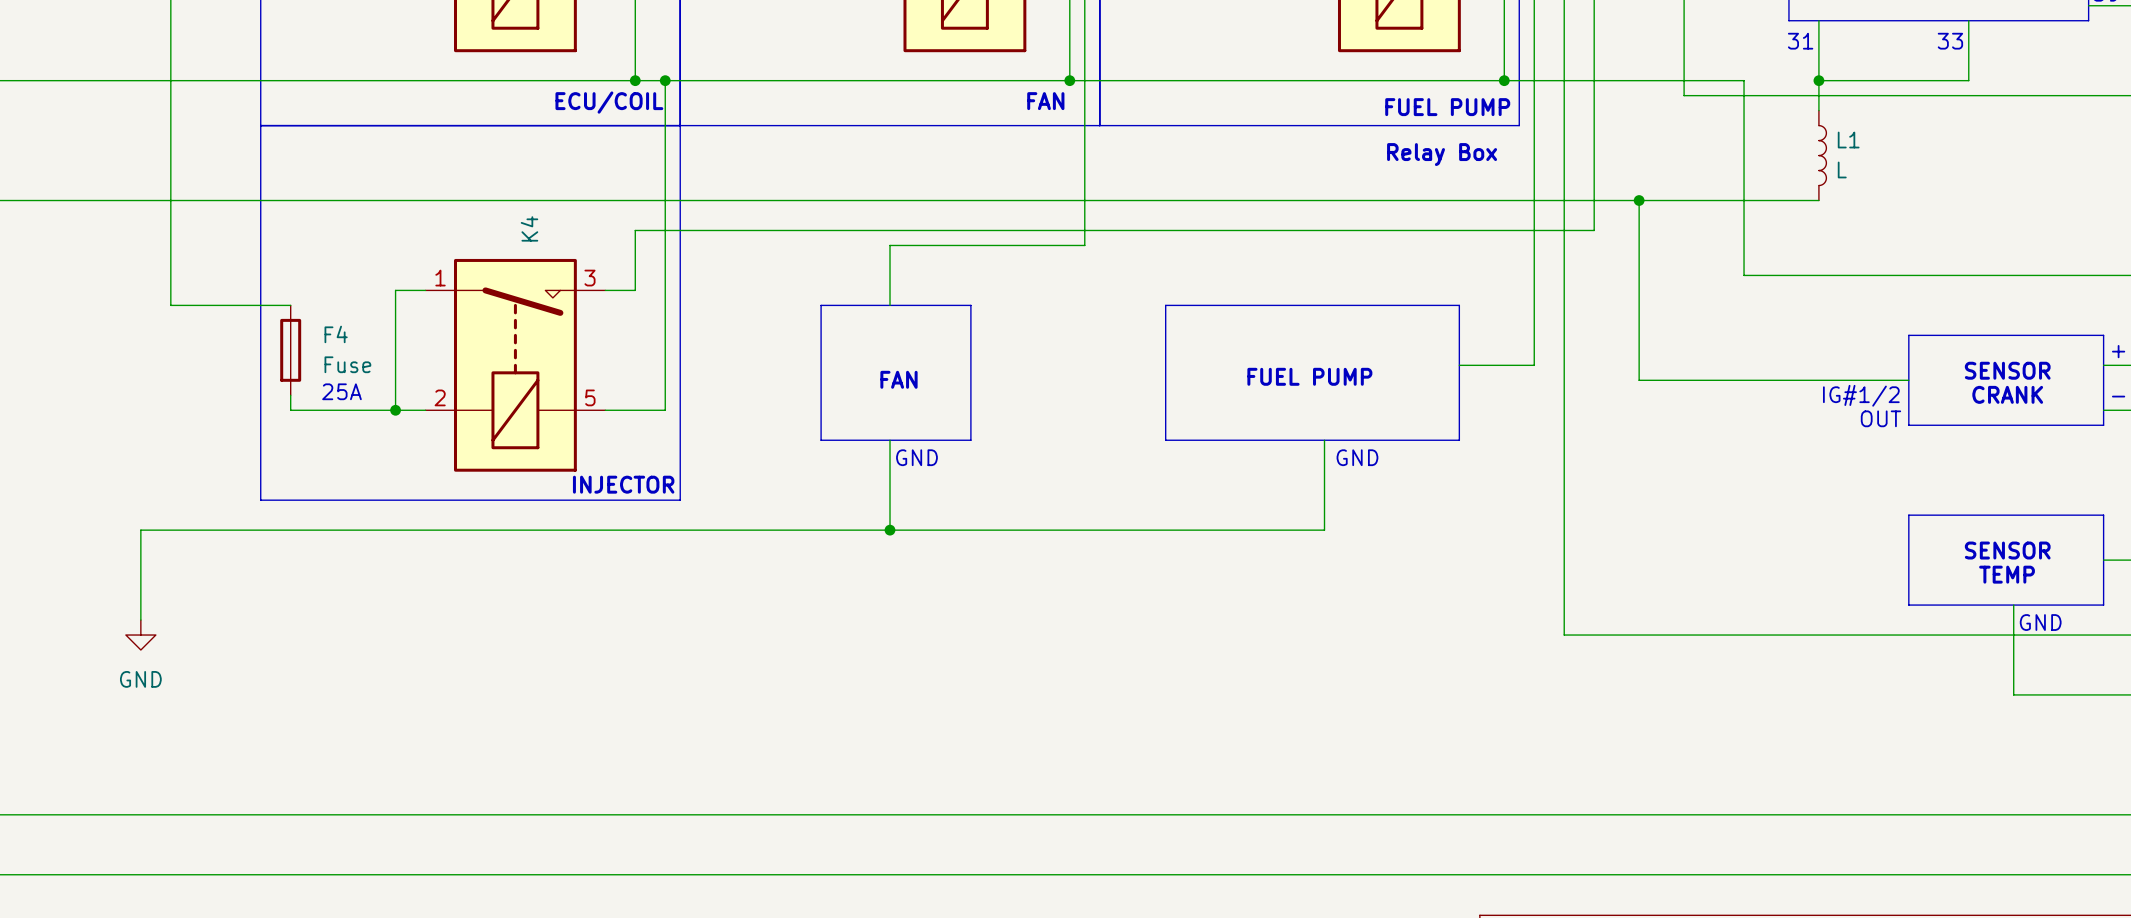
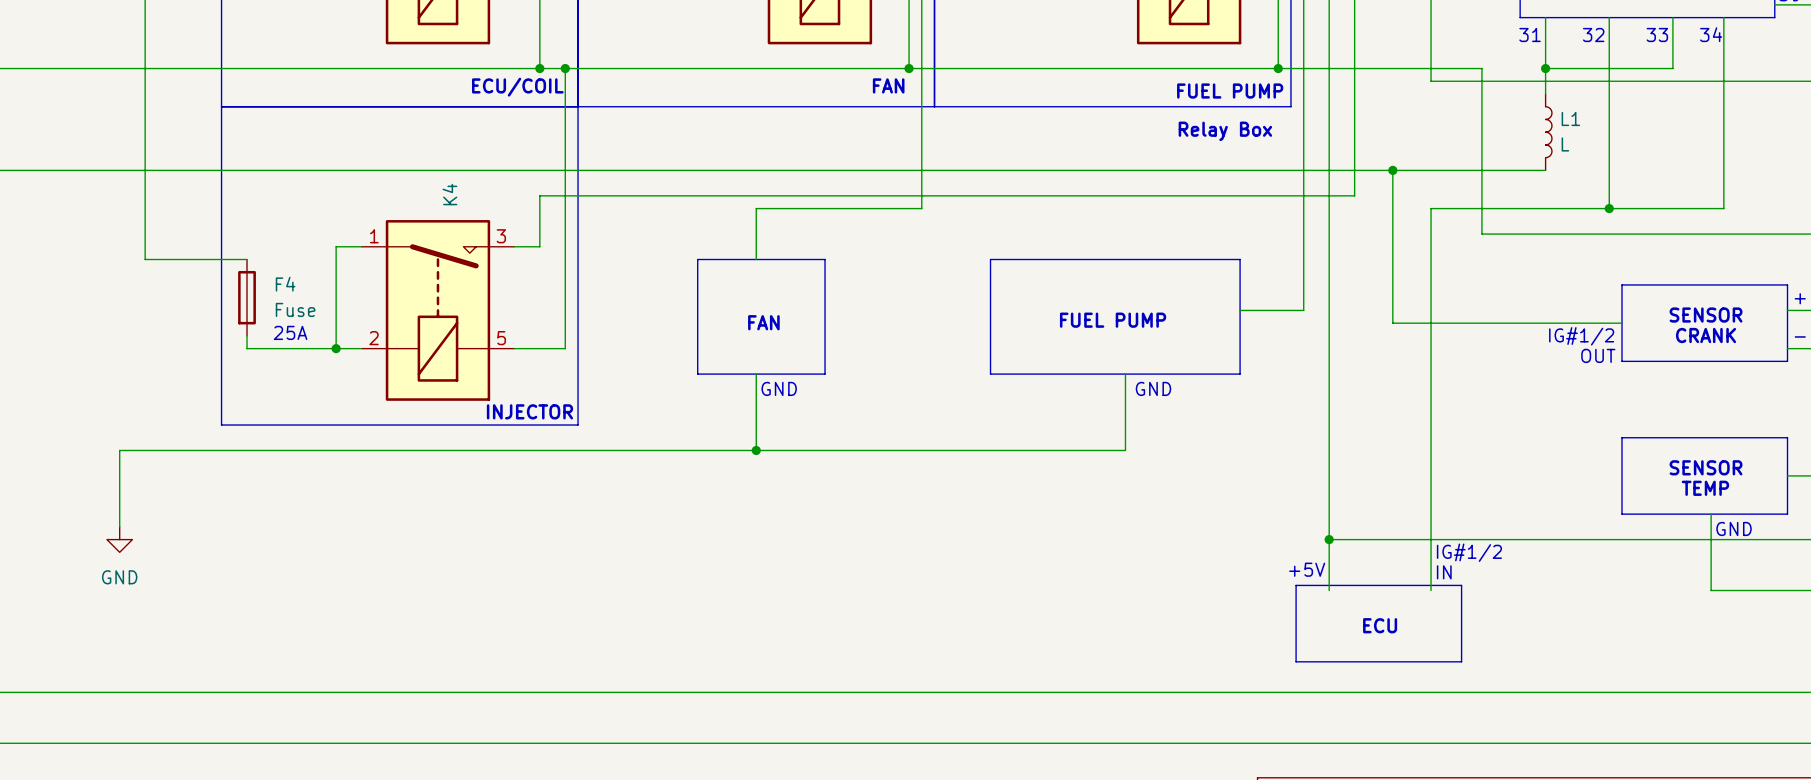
wire: none -> (1609, 17) (1609, 208)
wire: none -> (1723, 17) (1723, 208) (1431, 208) (1431, 590)
text: none -> 34 (1711, 34)
text: none -> 32 (1593, 35)
junction: none -> (1609, 208)
wire: none -> (1329, 539) (1329, 590)
junction: none -> (1329, 539)
text: none -> IG#1/2 (1469, 552)
text: none -> +5V (1307, 569)
text: none -> IN (1444, 572)
line: none -> (1296, 585) (1461, 585) (1461, 661) (1296, 661) (1296, 585)
text: none -> ECU (1380, 625)

